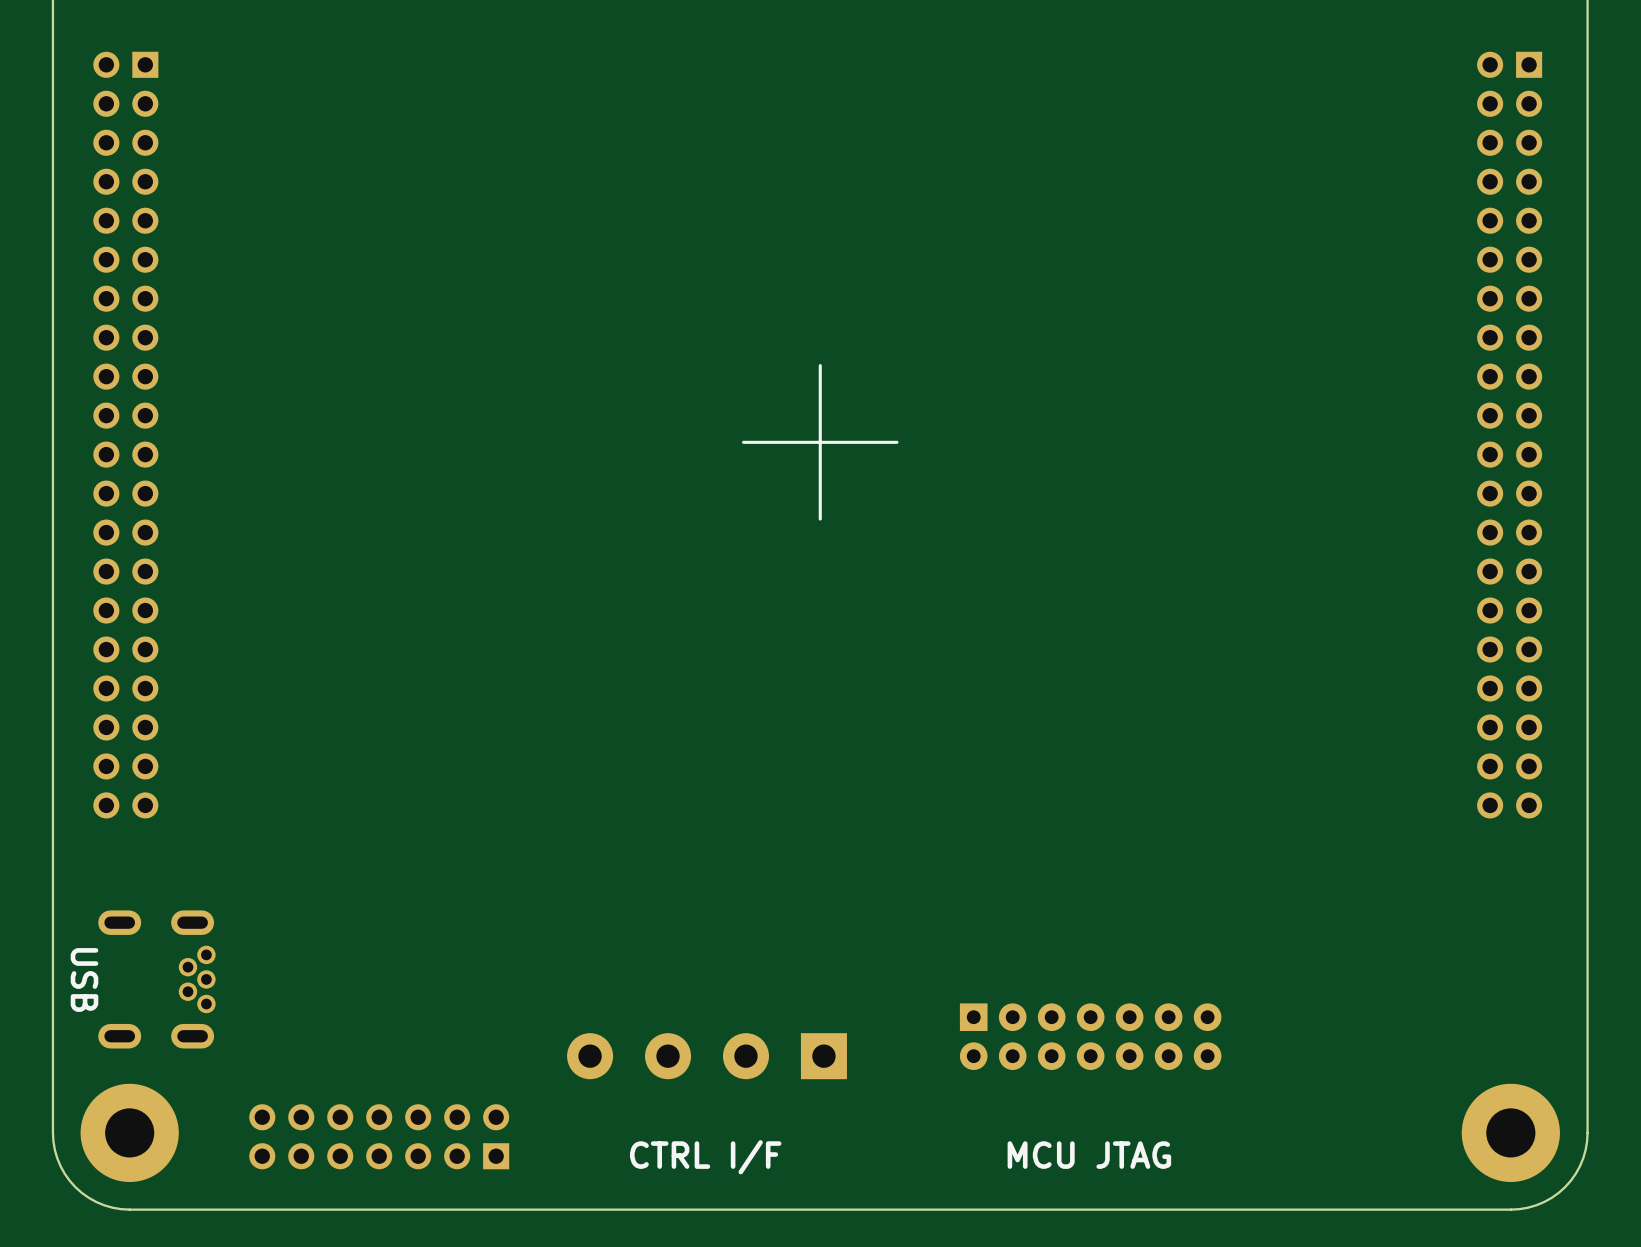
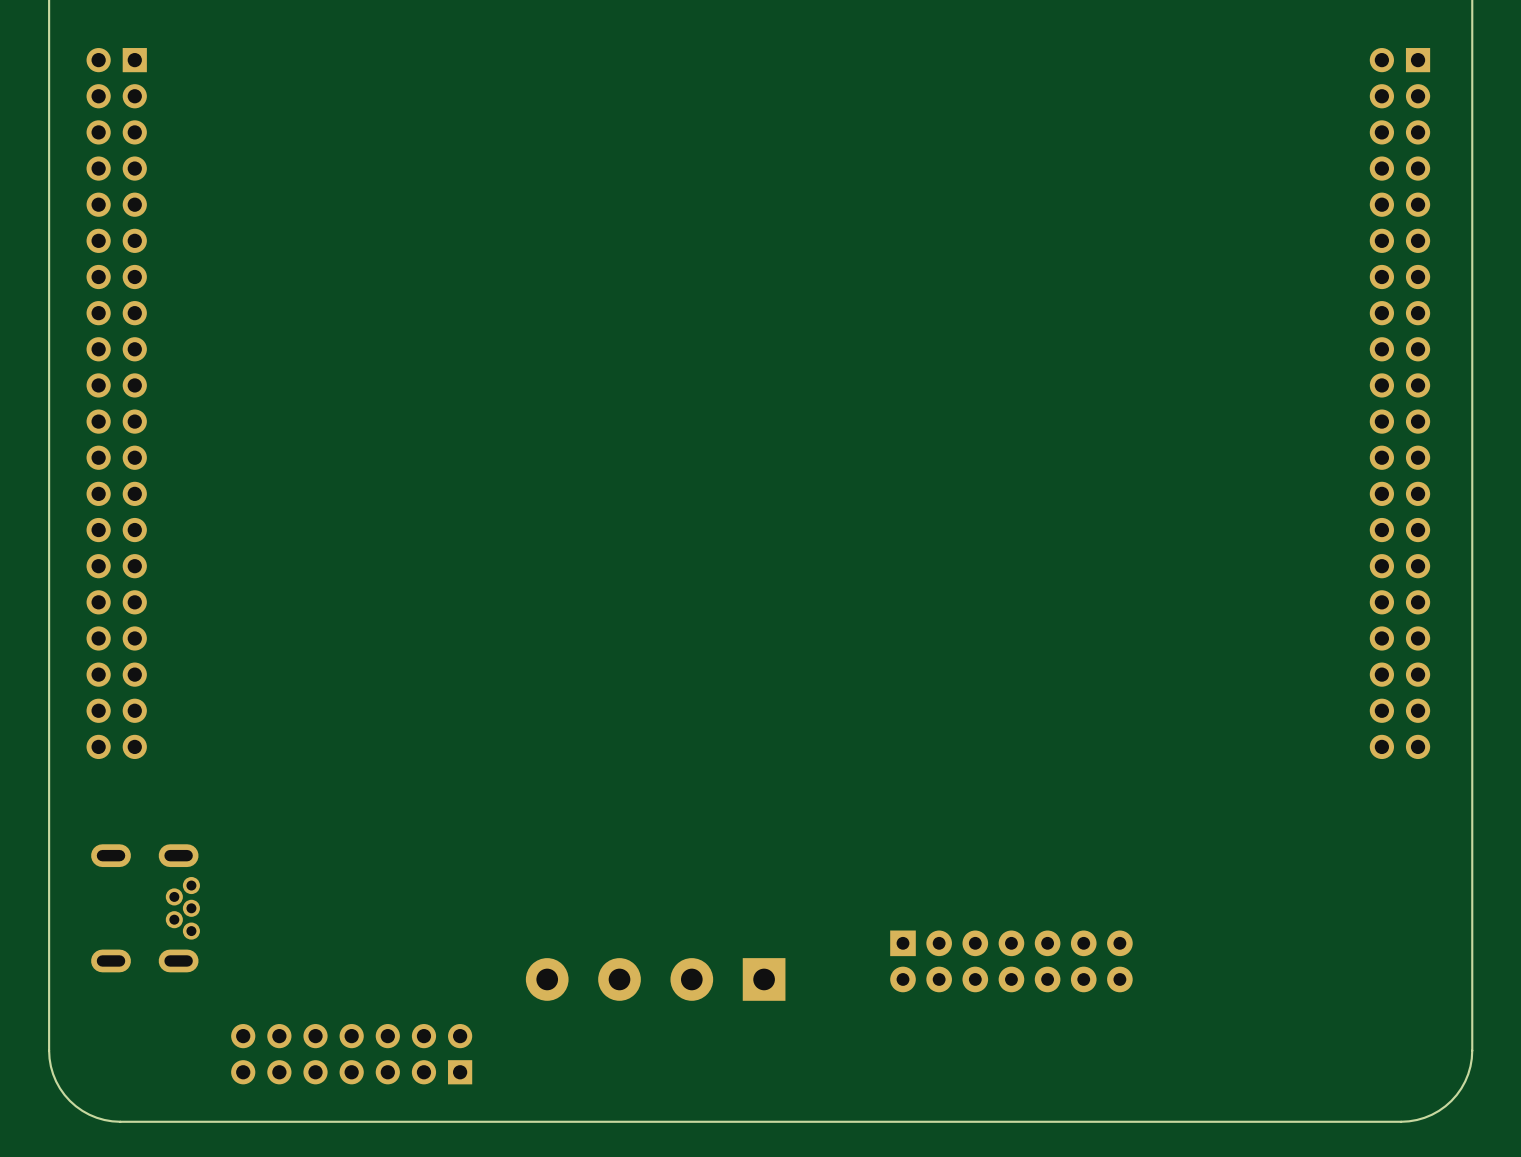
line: (820, 365) (820, 519) -> none
line: (896, 442) (743, 442) -> none
text: USB (84, 980) -> none
part: (129, 1132) -> none
part: (1510, 1132) -> none
text: MCU JTAG (1089, 1155) -> none
text: CTRL I/F (705, 1157) -> none

